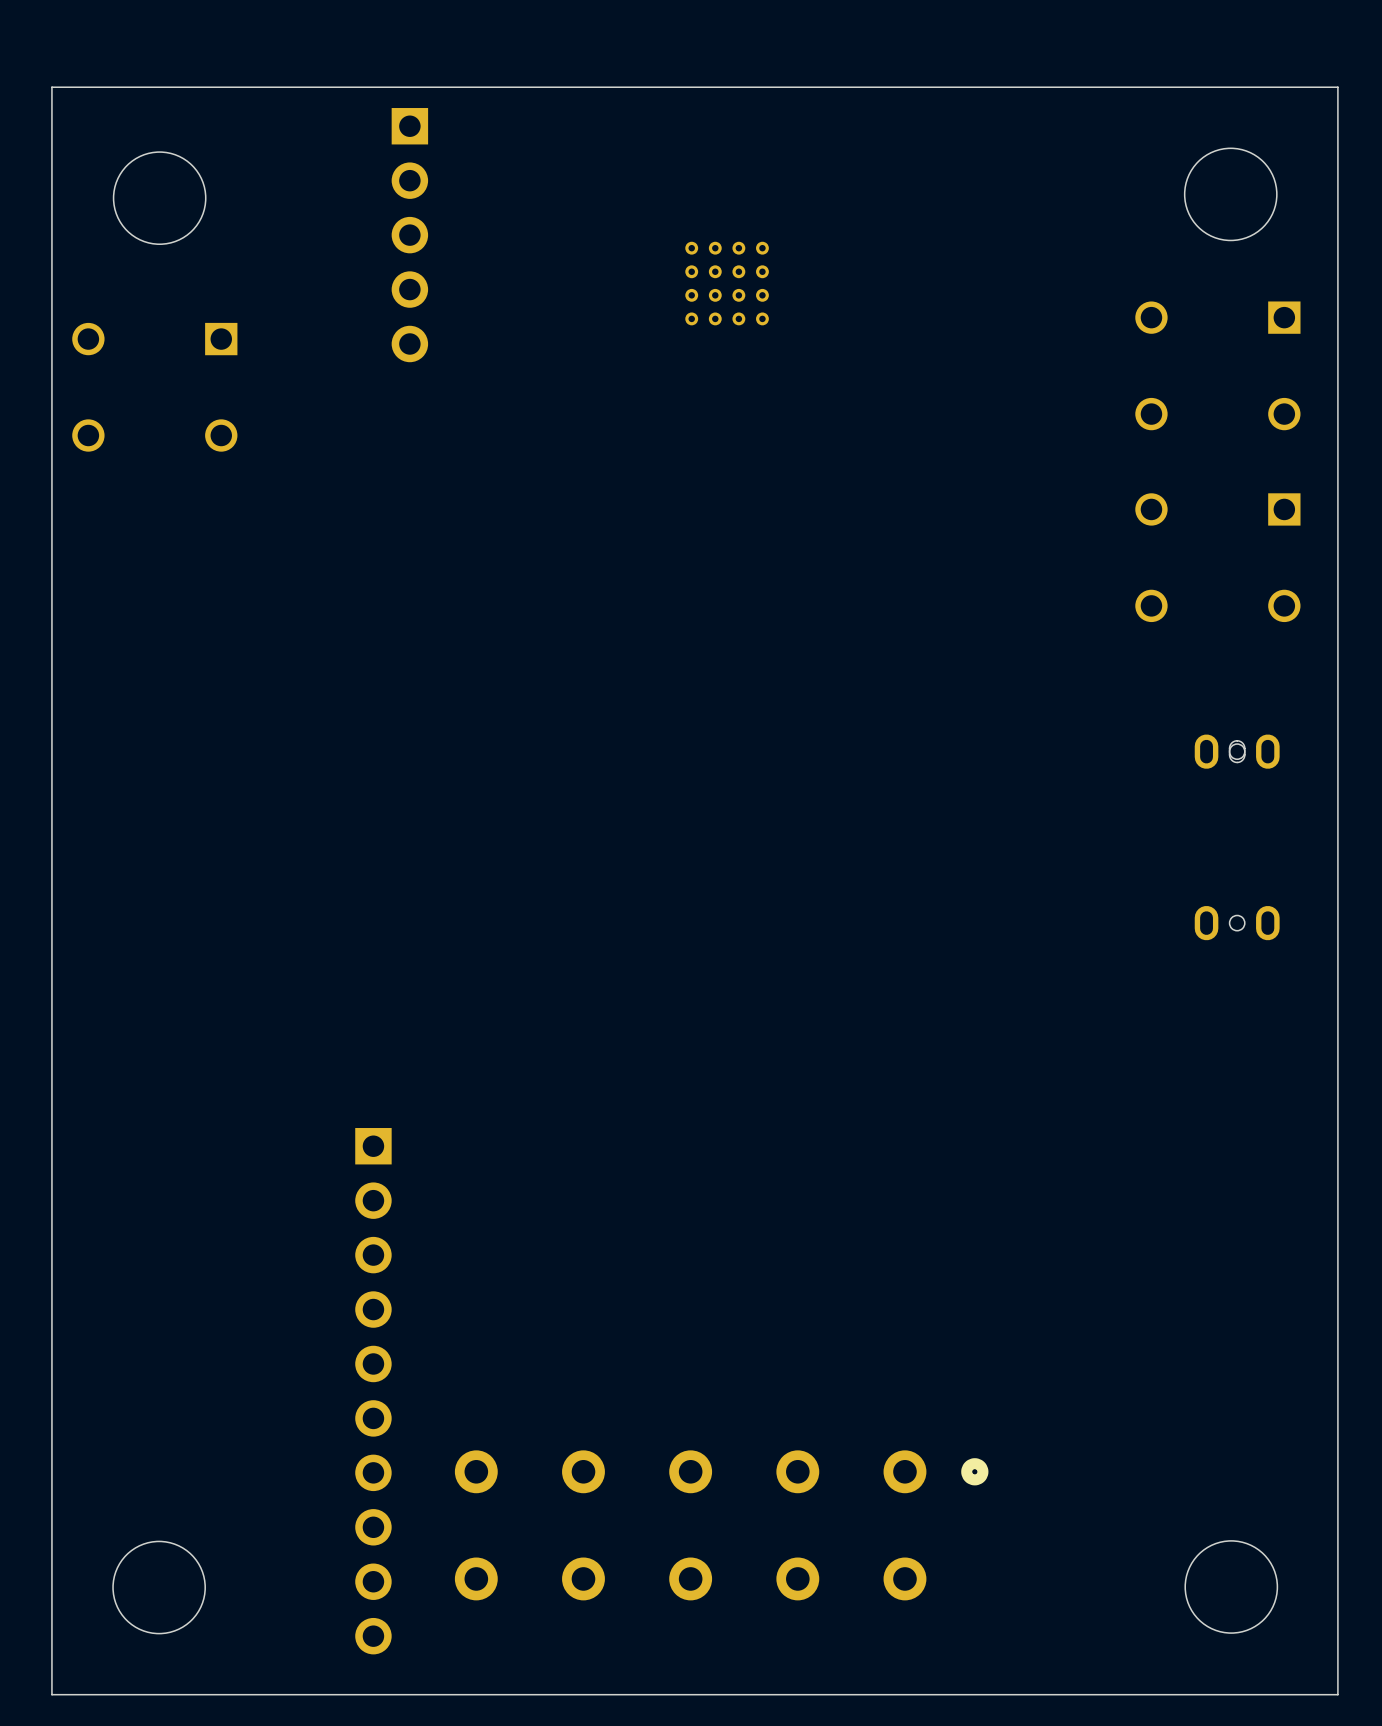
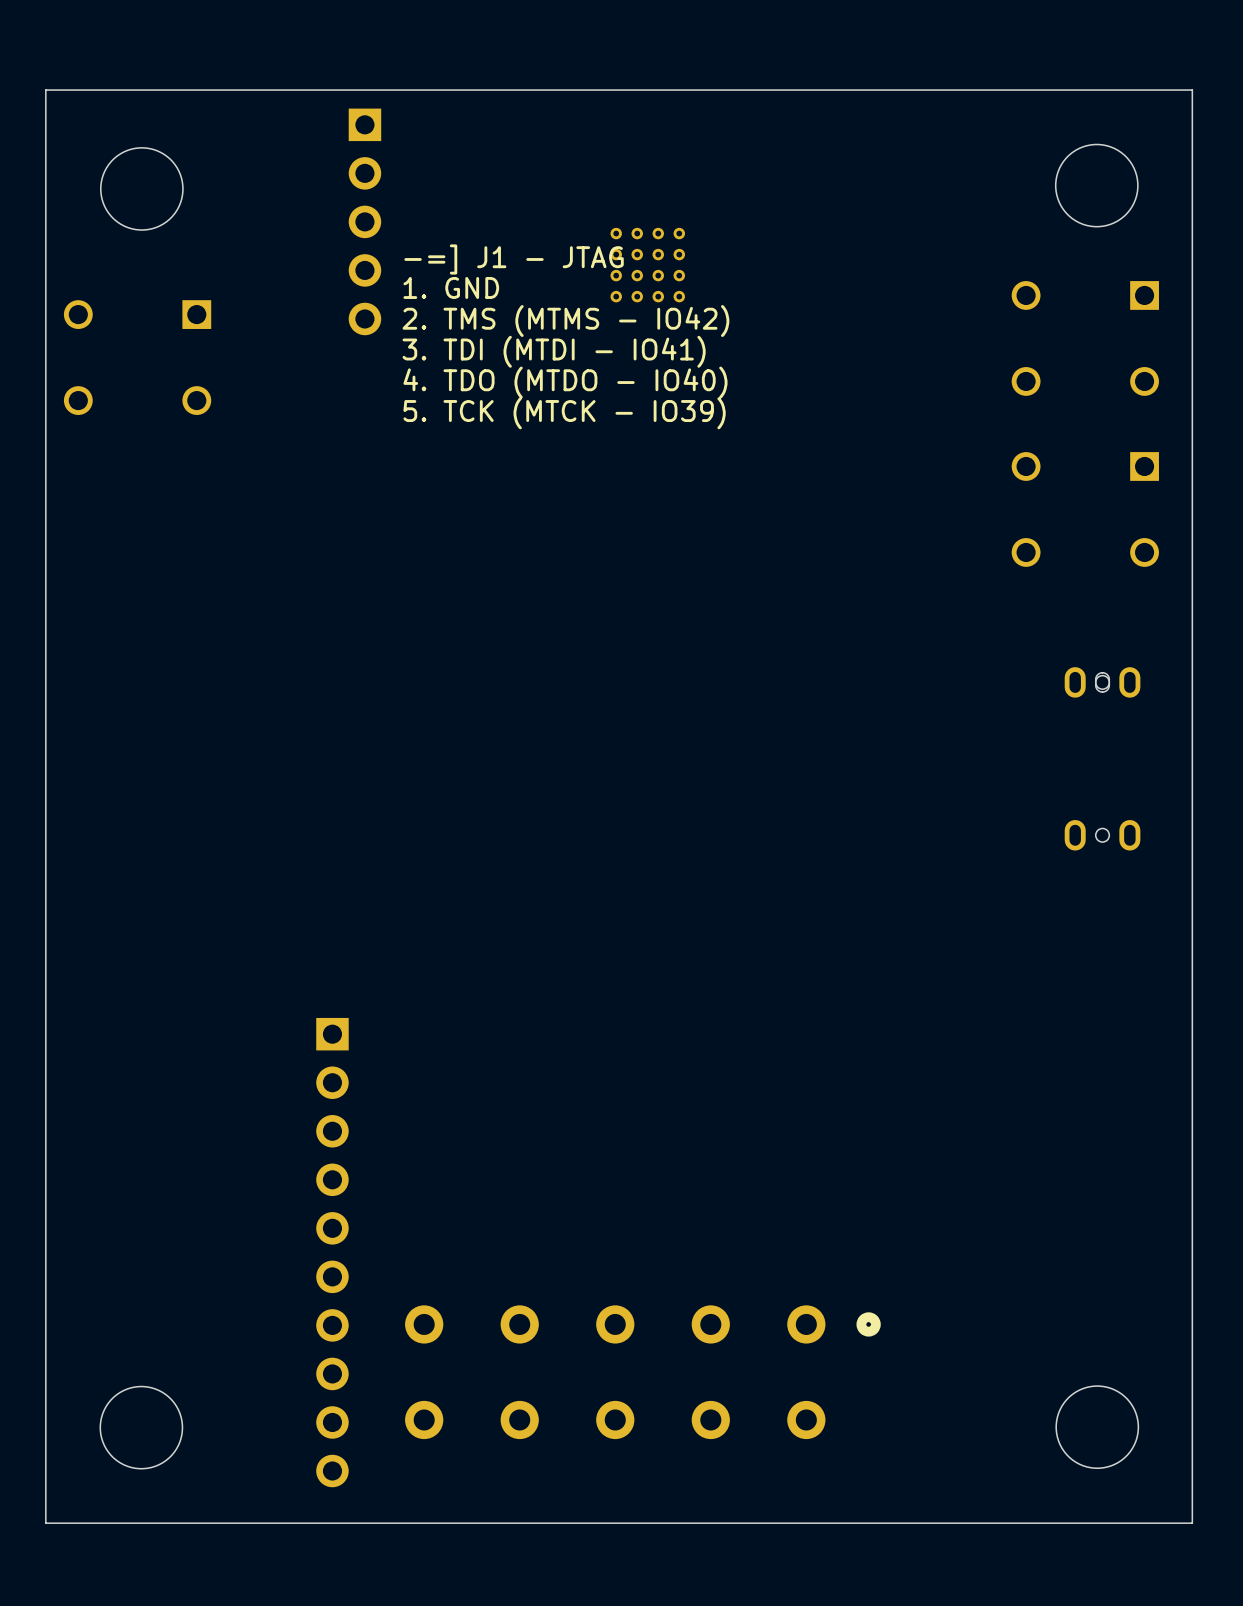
text: none -> -=] J1 - JTAG (514, 259)
text: none -> 1. GND (451, 287)
text: none -> 2. TMS (MTMS - IO42) (565, 321)
text: none -> 3. TDI (MTDI - IO41) (554, 351)
text: none -> 4. TDO (MTDO - IO40) (565, 382)
text: none -> 5. TCK (MTCK - IO39) (564, 413)

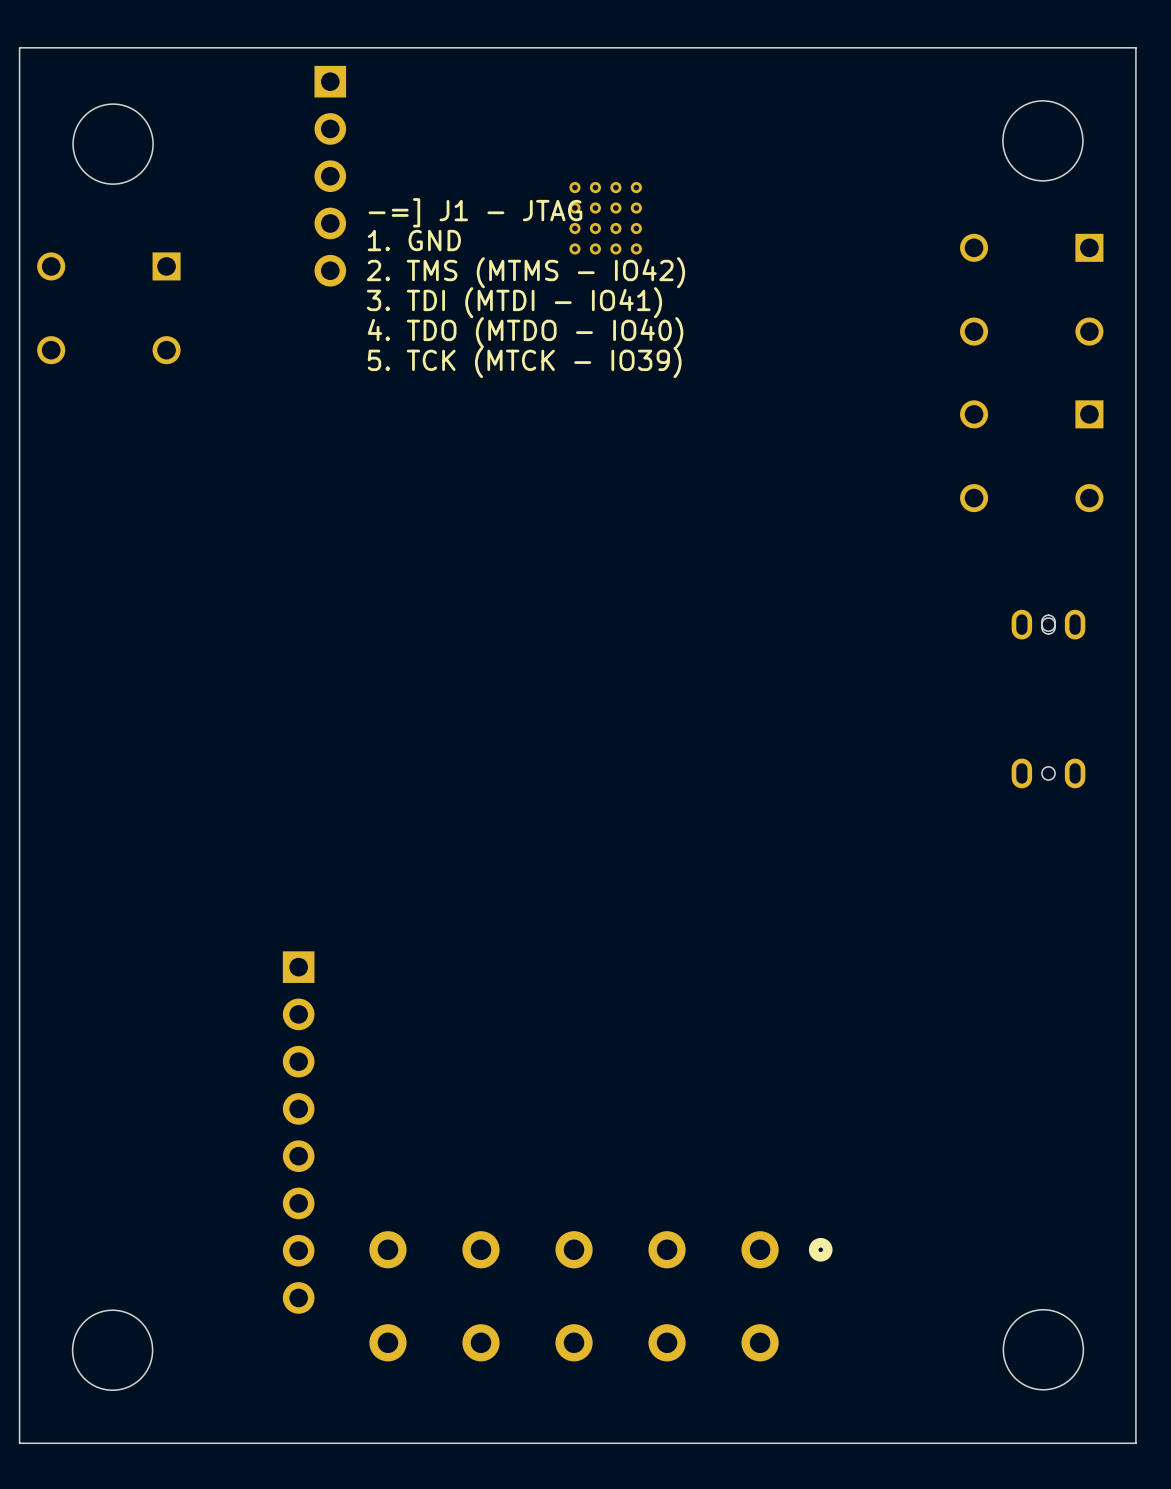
part: (332, 1252) -> none

